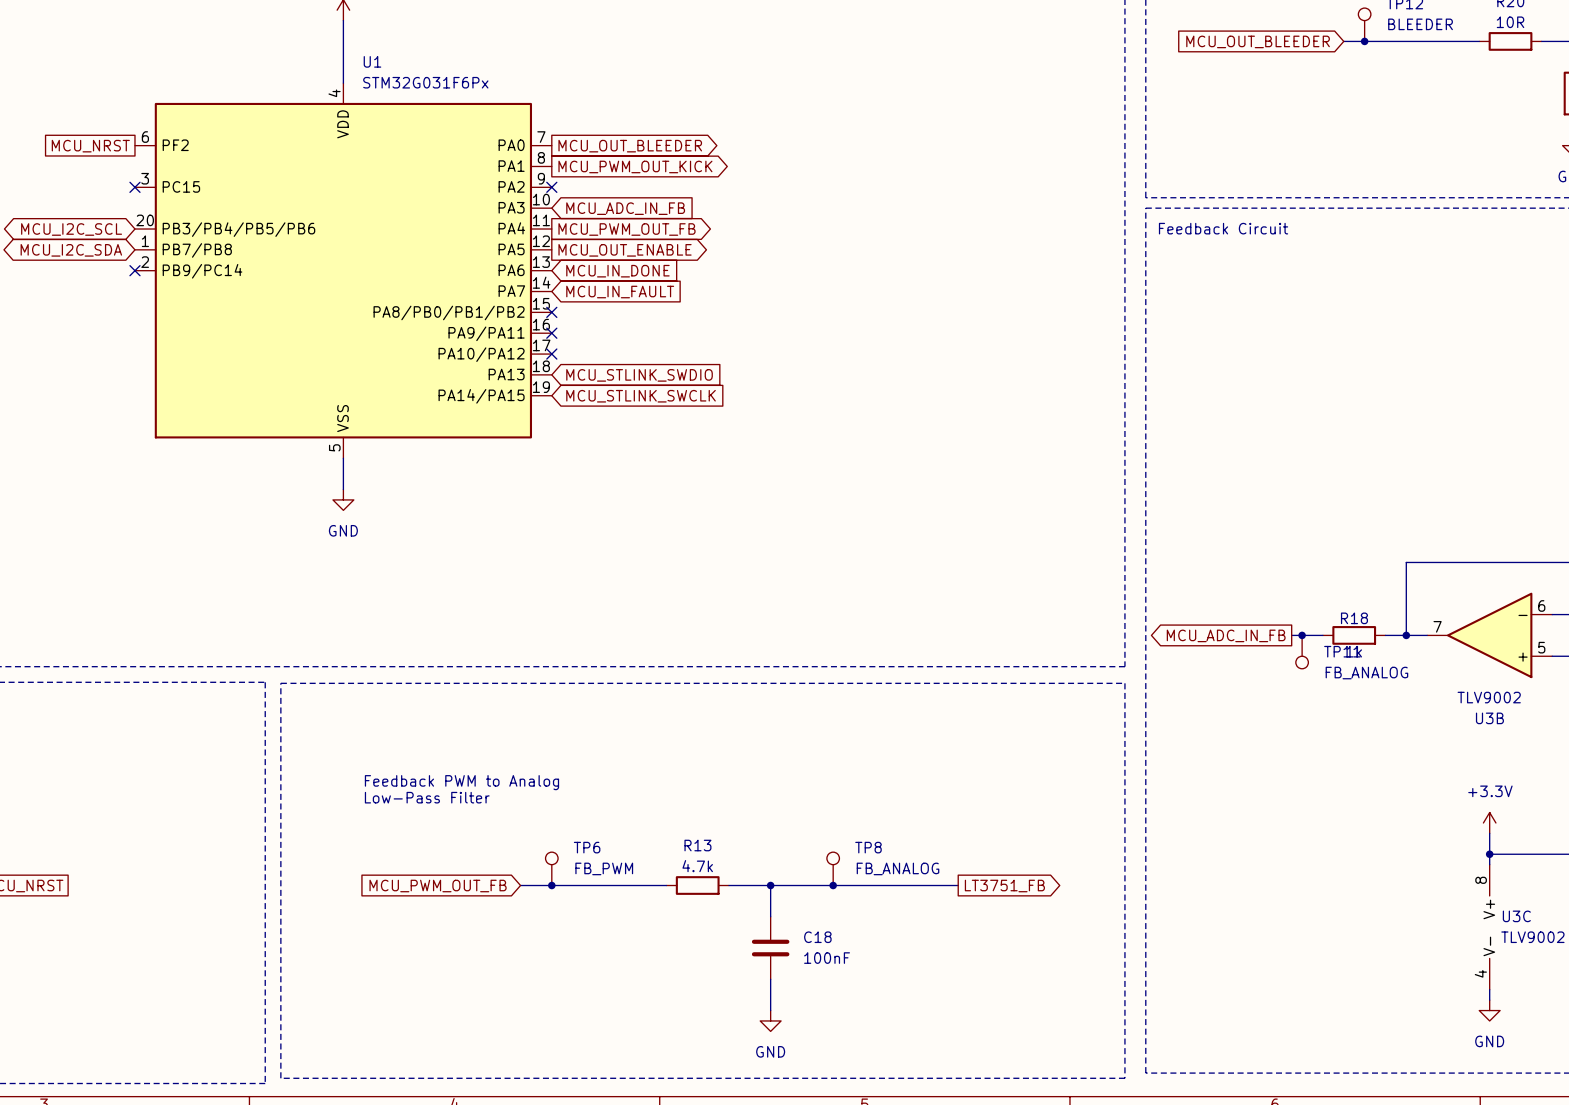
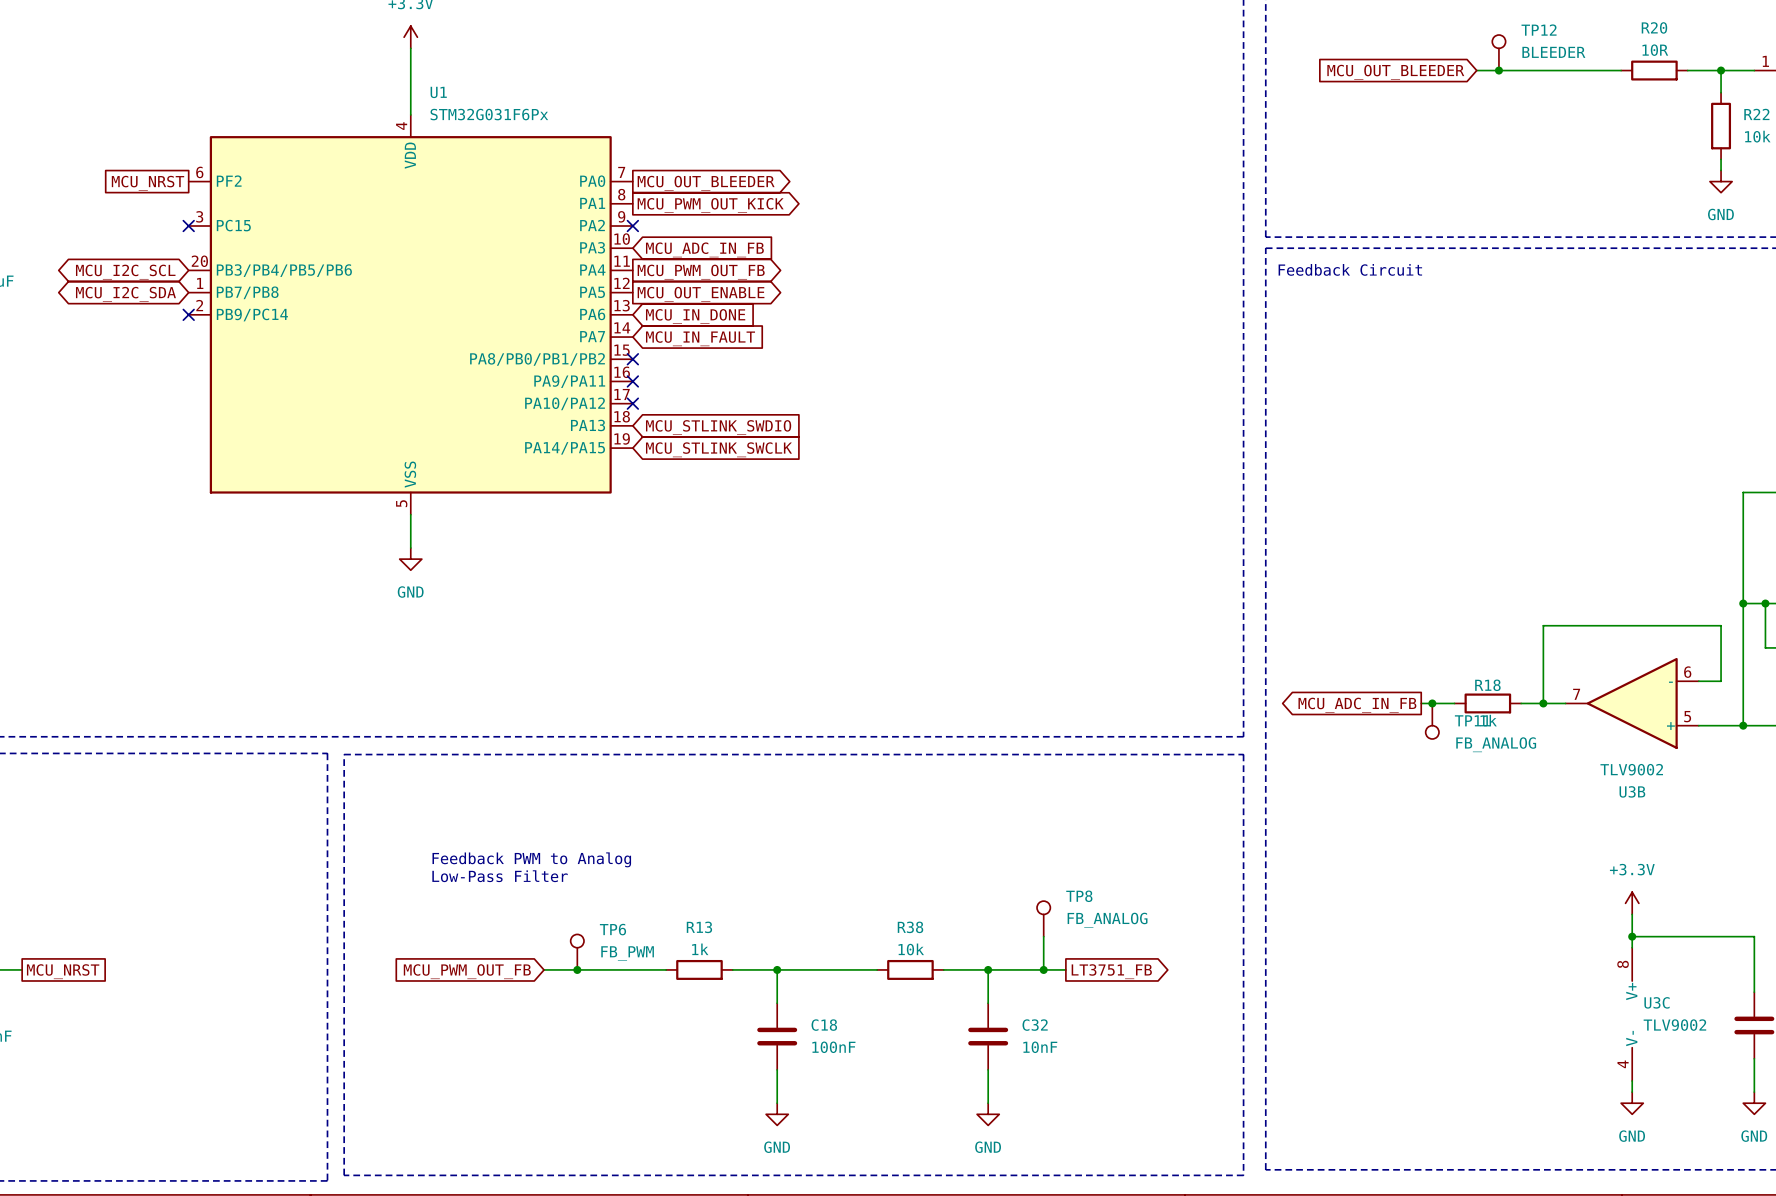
wire: none -> (1043, 936) (1043, 969)
R13 value: 4.7k (697, 866) -> 1k (700, 949)
TP6 position: (551, 868) -> (577, 952)
TP8 position: (833, 868) -> (1043, 918)
wire: none -> (544, 969) (599, 969)
junction: none -> (577, 969)
junction: (551, 885) -> none
wire: (583, 885) (645, 885) -> (754, 969) (821, 969)
junction: none -> (777, 969)
R13 position: (697, 885) -> (699, 969)
wire: (770, 885) (770, 916) -> (777, 969) (777, 1003)
junction: (770, 885) -> none
wire: (781, 885) (843, 885) -> none
R38: none -> 10k (910, 969)
junction: (833, 885) -> none
wire: none -> (988, 969) (988, 1003)
junction: none -> (988, 969)
junction: none -> (1043, 969)
global label position: MCU_PWM_OUT_FB (438, 886) -> MCU_PWM_OUT_FB (467, 971)
C18 position: (770, 948) -> (777, 1036)
C32: none -> 10nF (988, 1036)
wire: (770, 979) (770, 1010) -> (777, 1069) (777, 1103)
wire: none -> (988, 1069) (988, 1103)
power symbol: none -> GND (777, 1114)
power symbol: GND (770, 1020) -> none
power symbol: none -> GND (988, 1114)

